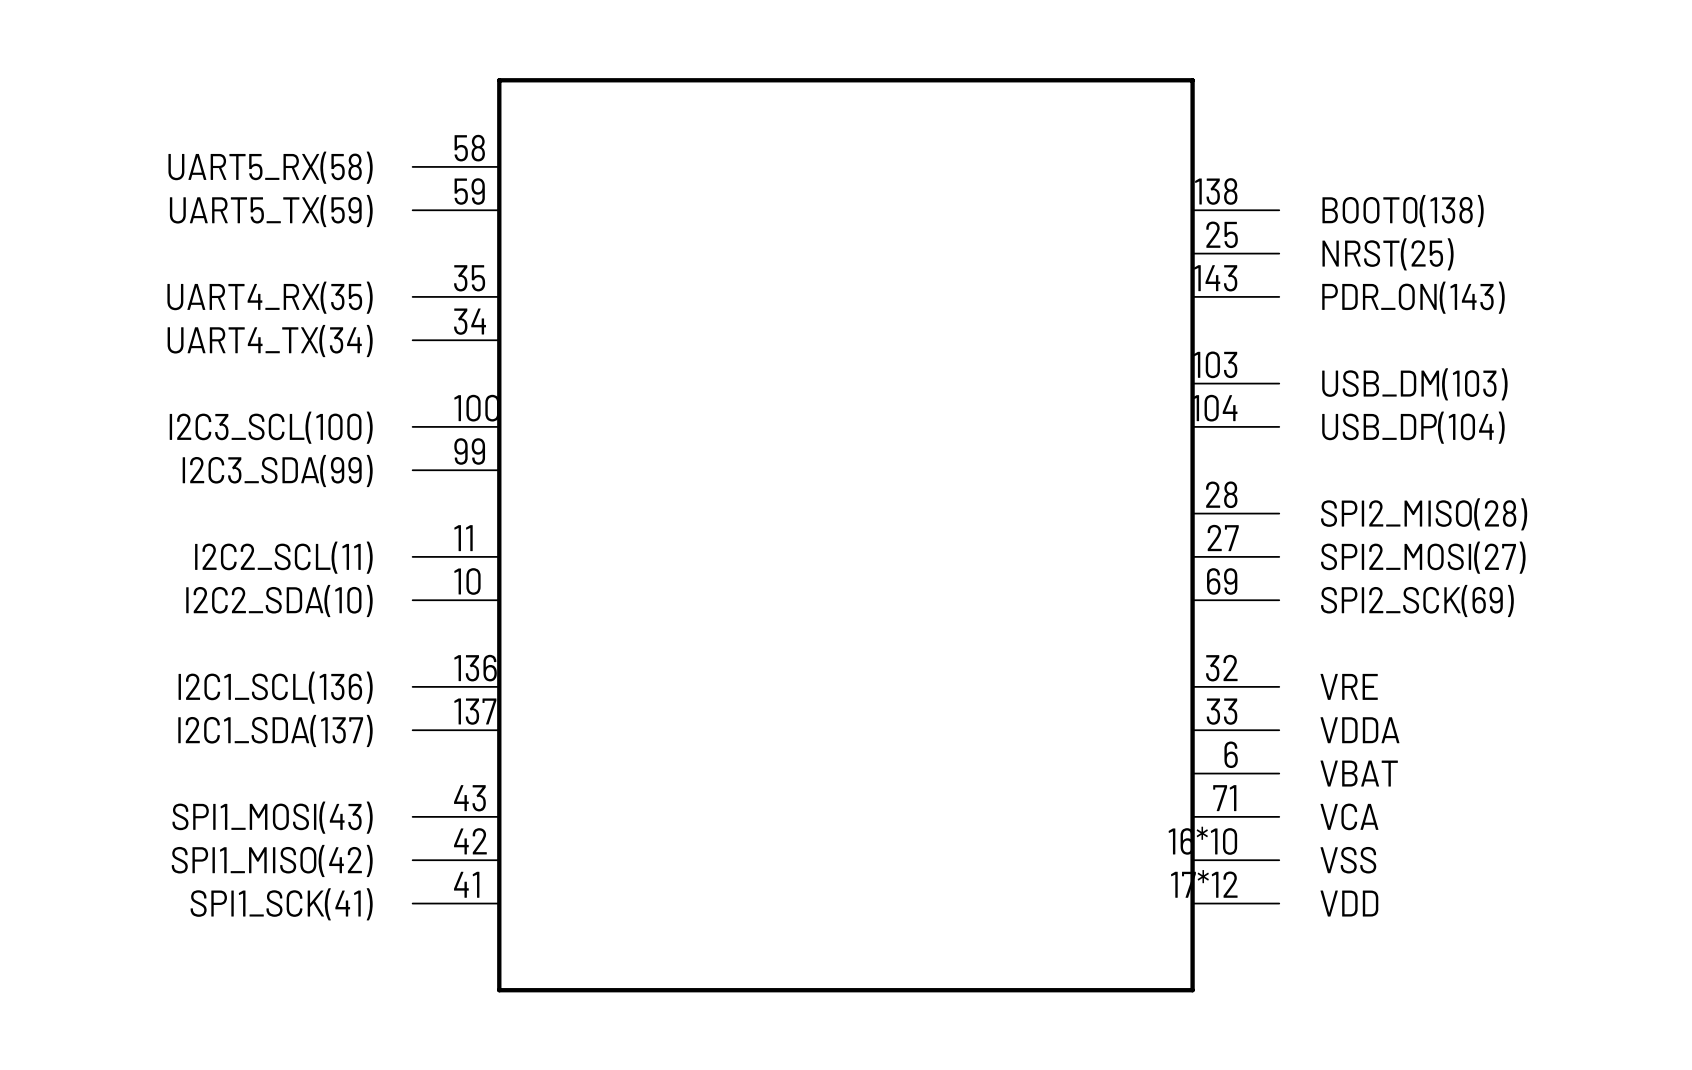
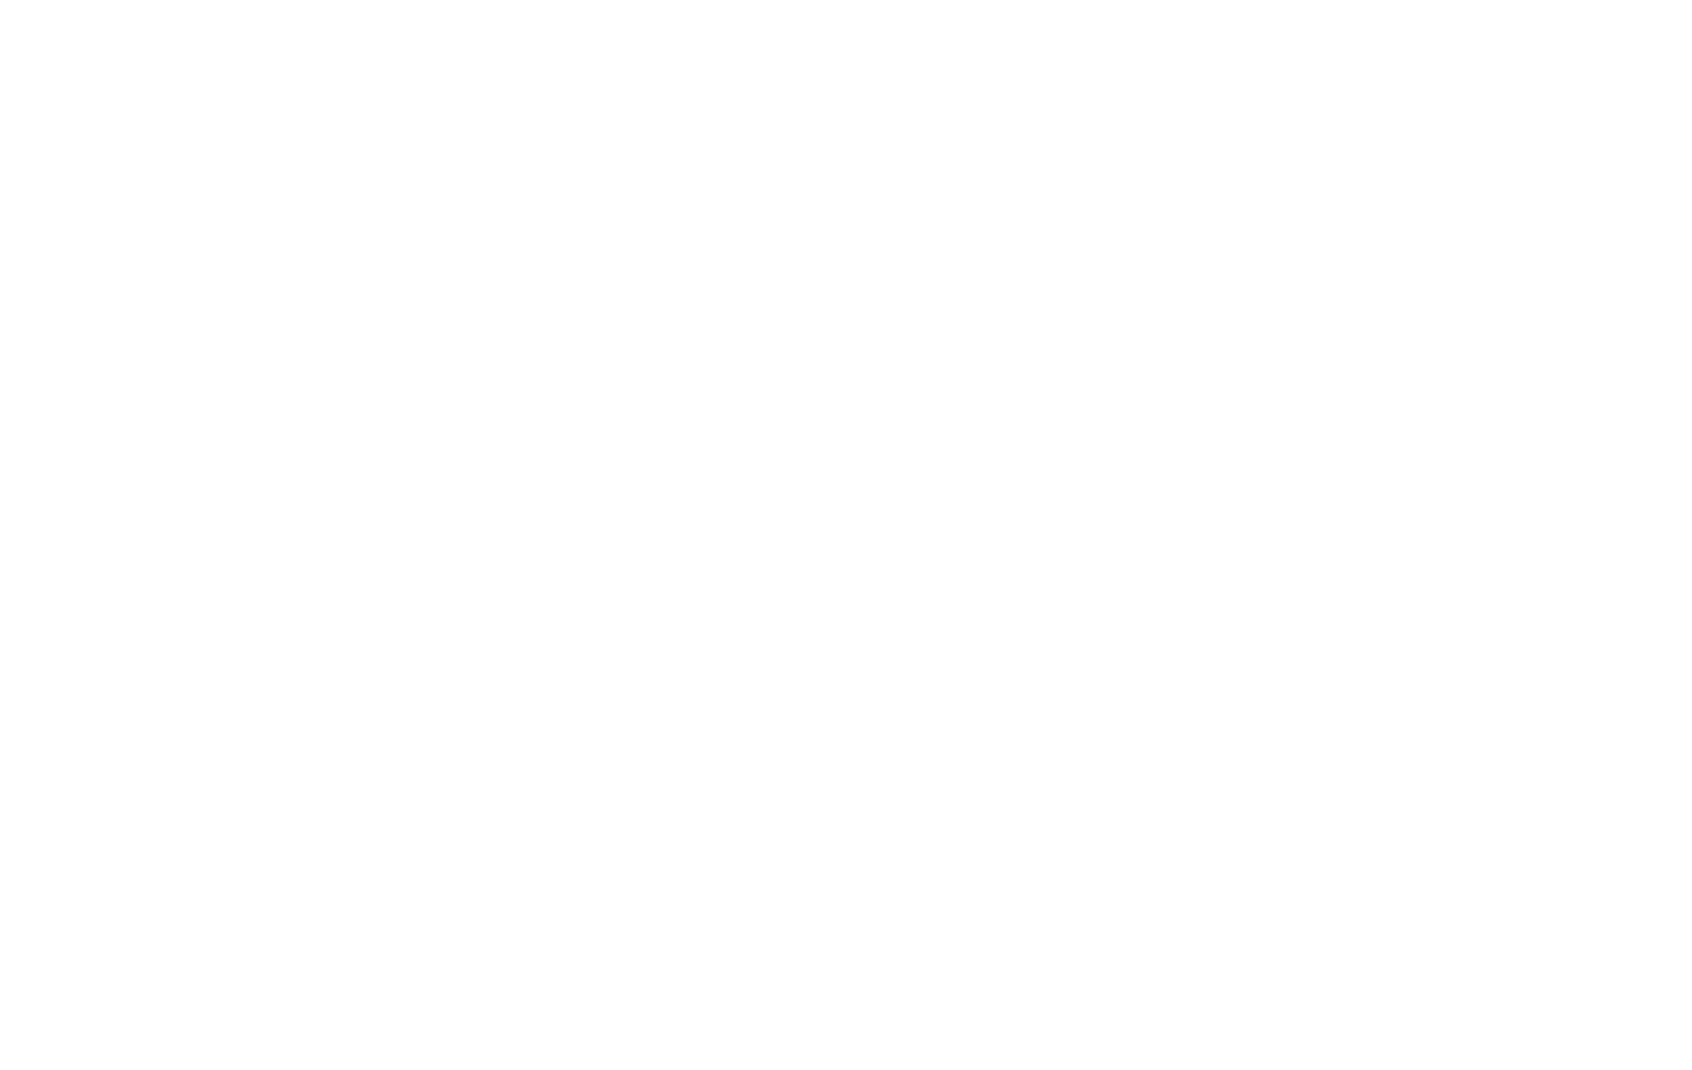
part: (845, 535) -> none

